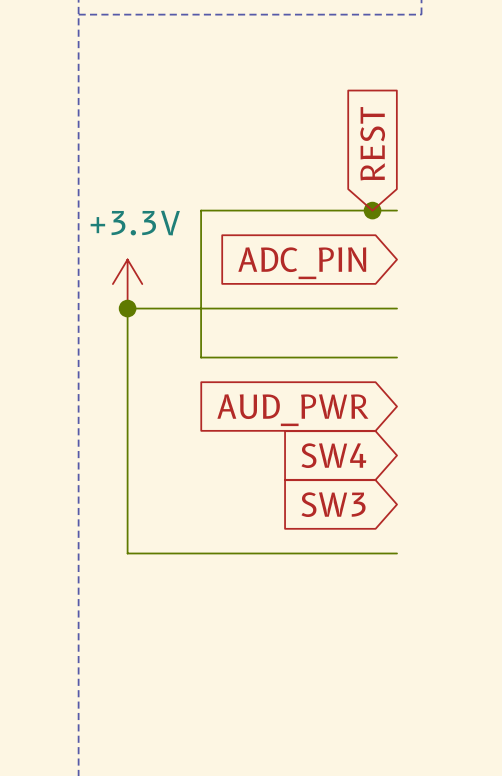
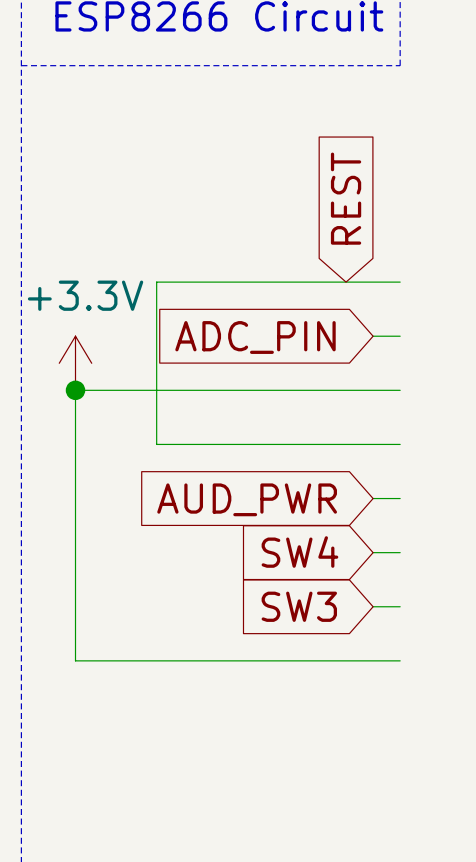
junction: (372, 210) -> none
wire: none -> (373, 282) (400, 282)
wire: none -> (373, 336) (400, 336)
wire: none -> (373, 390) (400, 390)
wire: none -> (373, 444) (400, 444)
wire: none -> (373, 498) (400, 498)
wire: none -> (373, 552) (400, 552)
wire: none -> (373, 606) (400, 606)
wire: none -> (373, 660) (400, 660)

